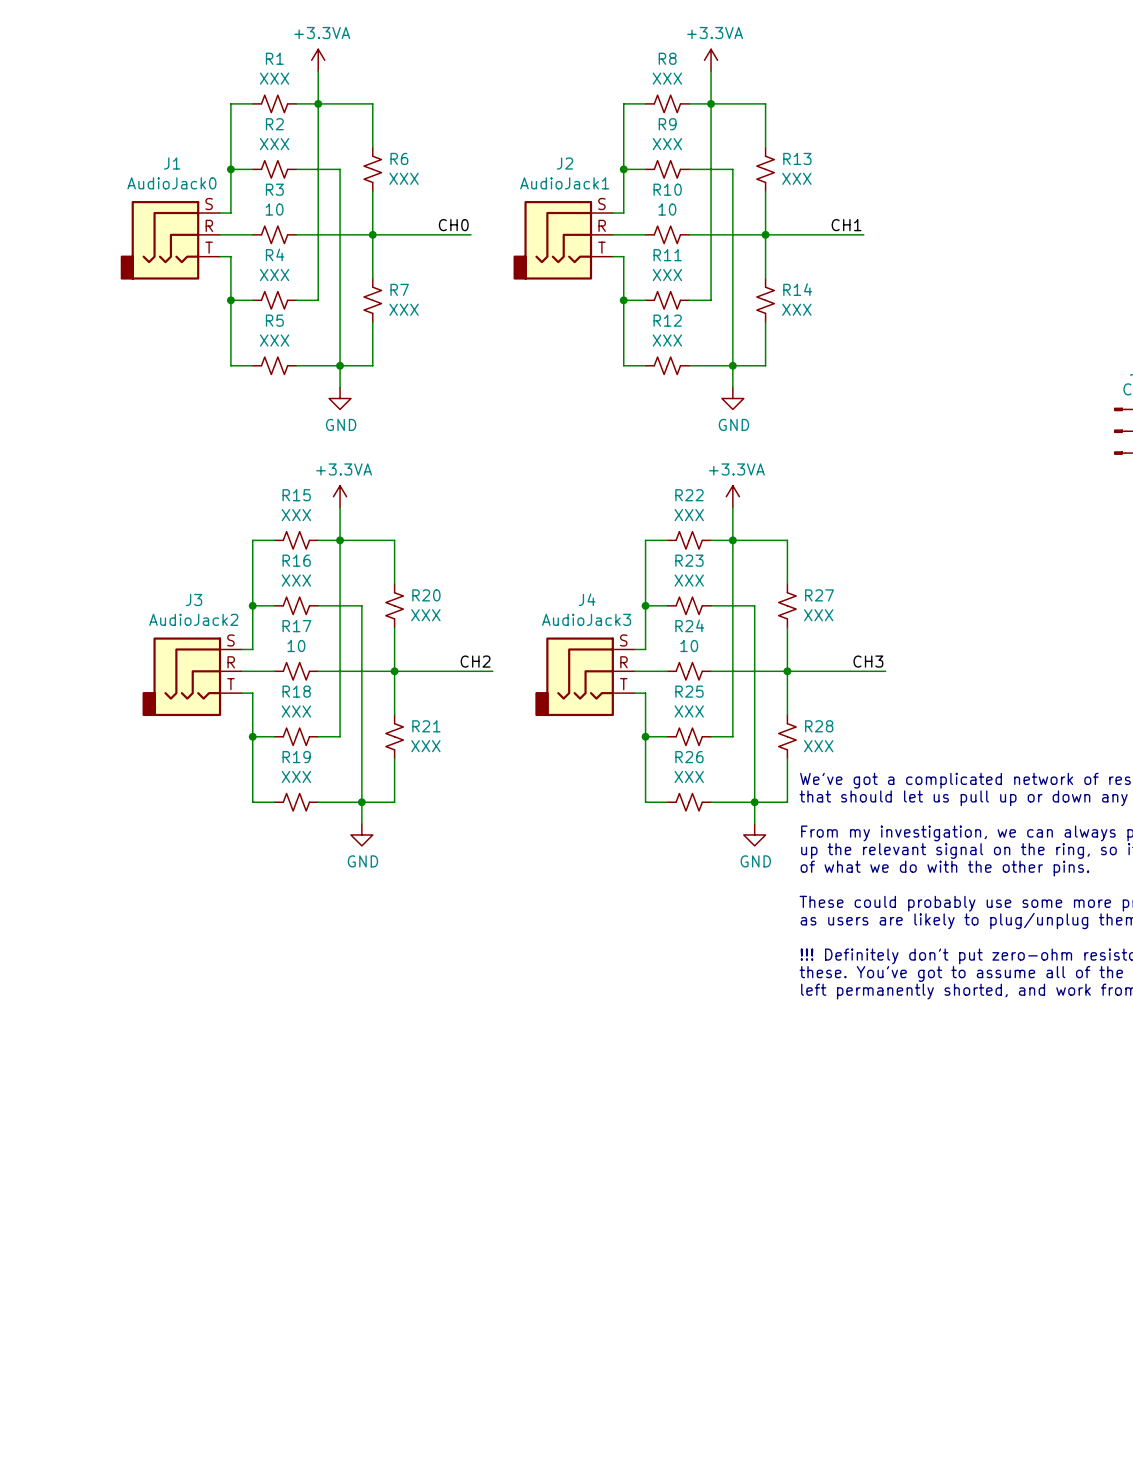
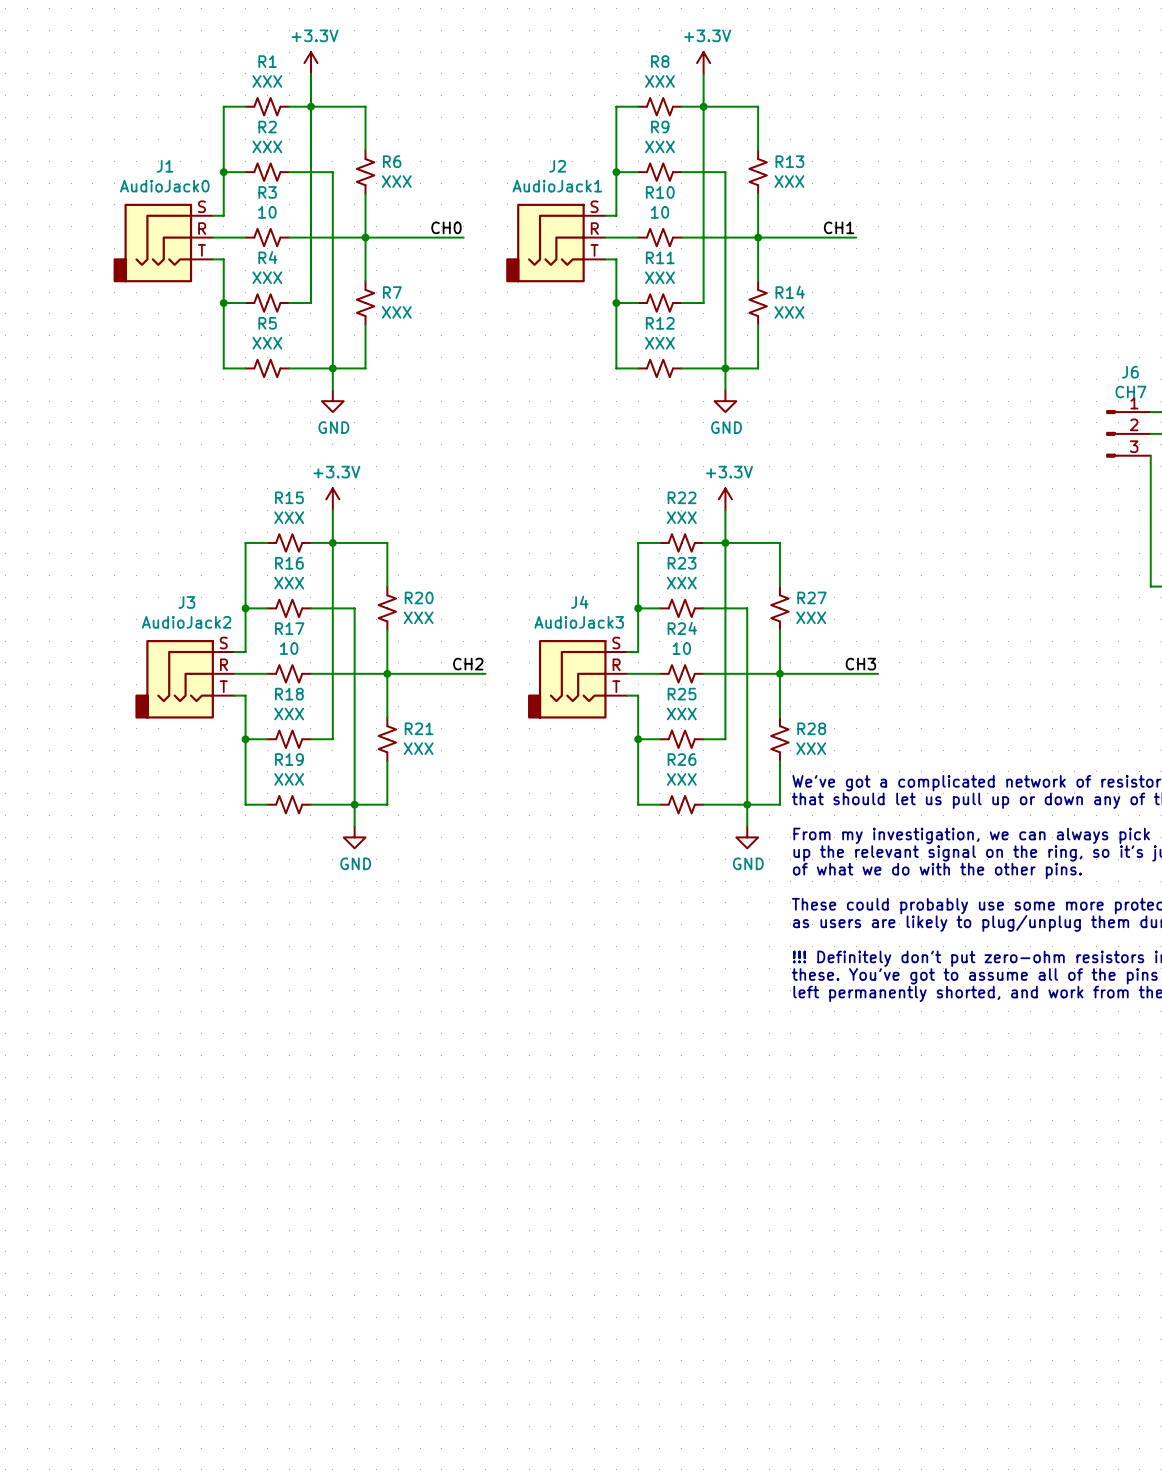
power symbol: +3.3VA (318, 60) -> +3.3V (310, 63)
power symbol: +3.3VA (711, 60) -> +3.3V (703, 63)
power symbol: +3.3VA (340, 496) -> +3.3V (332, 499)
power symbol: +3.3VA (732, 496) -> +3.3V (725, 499)

